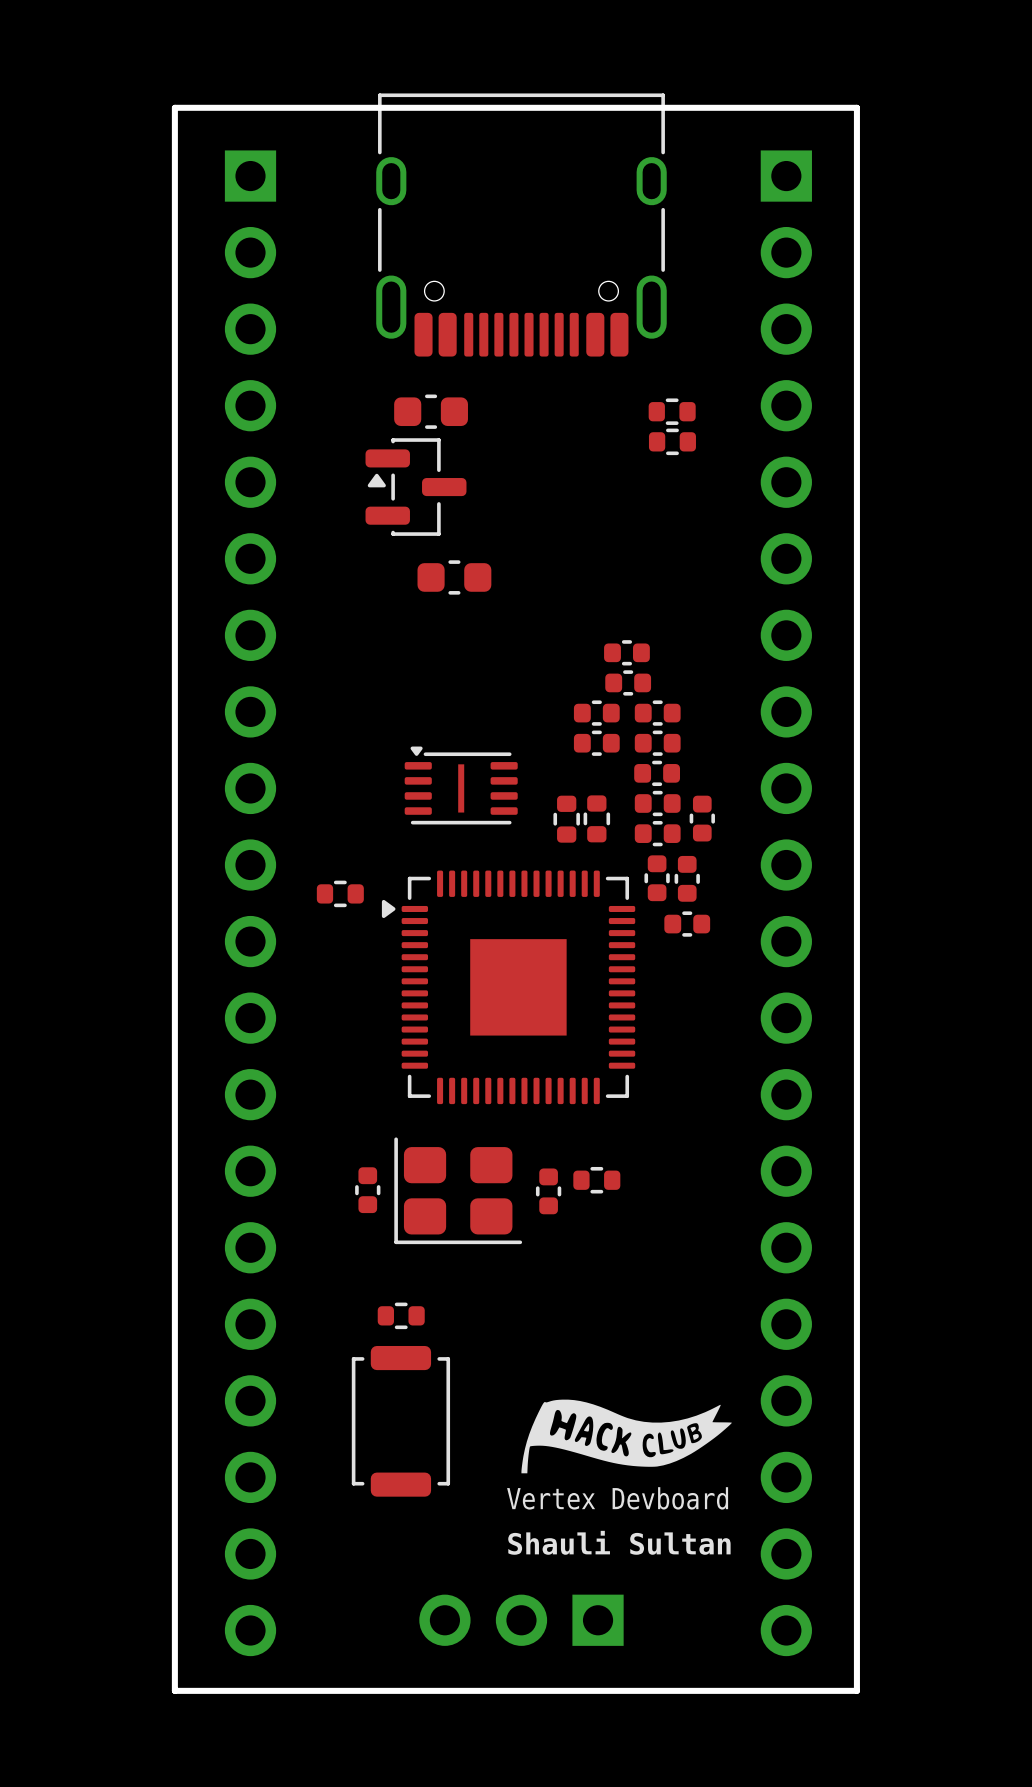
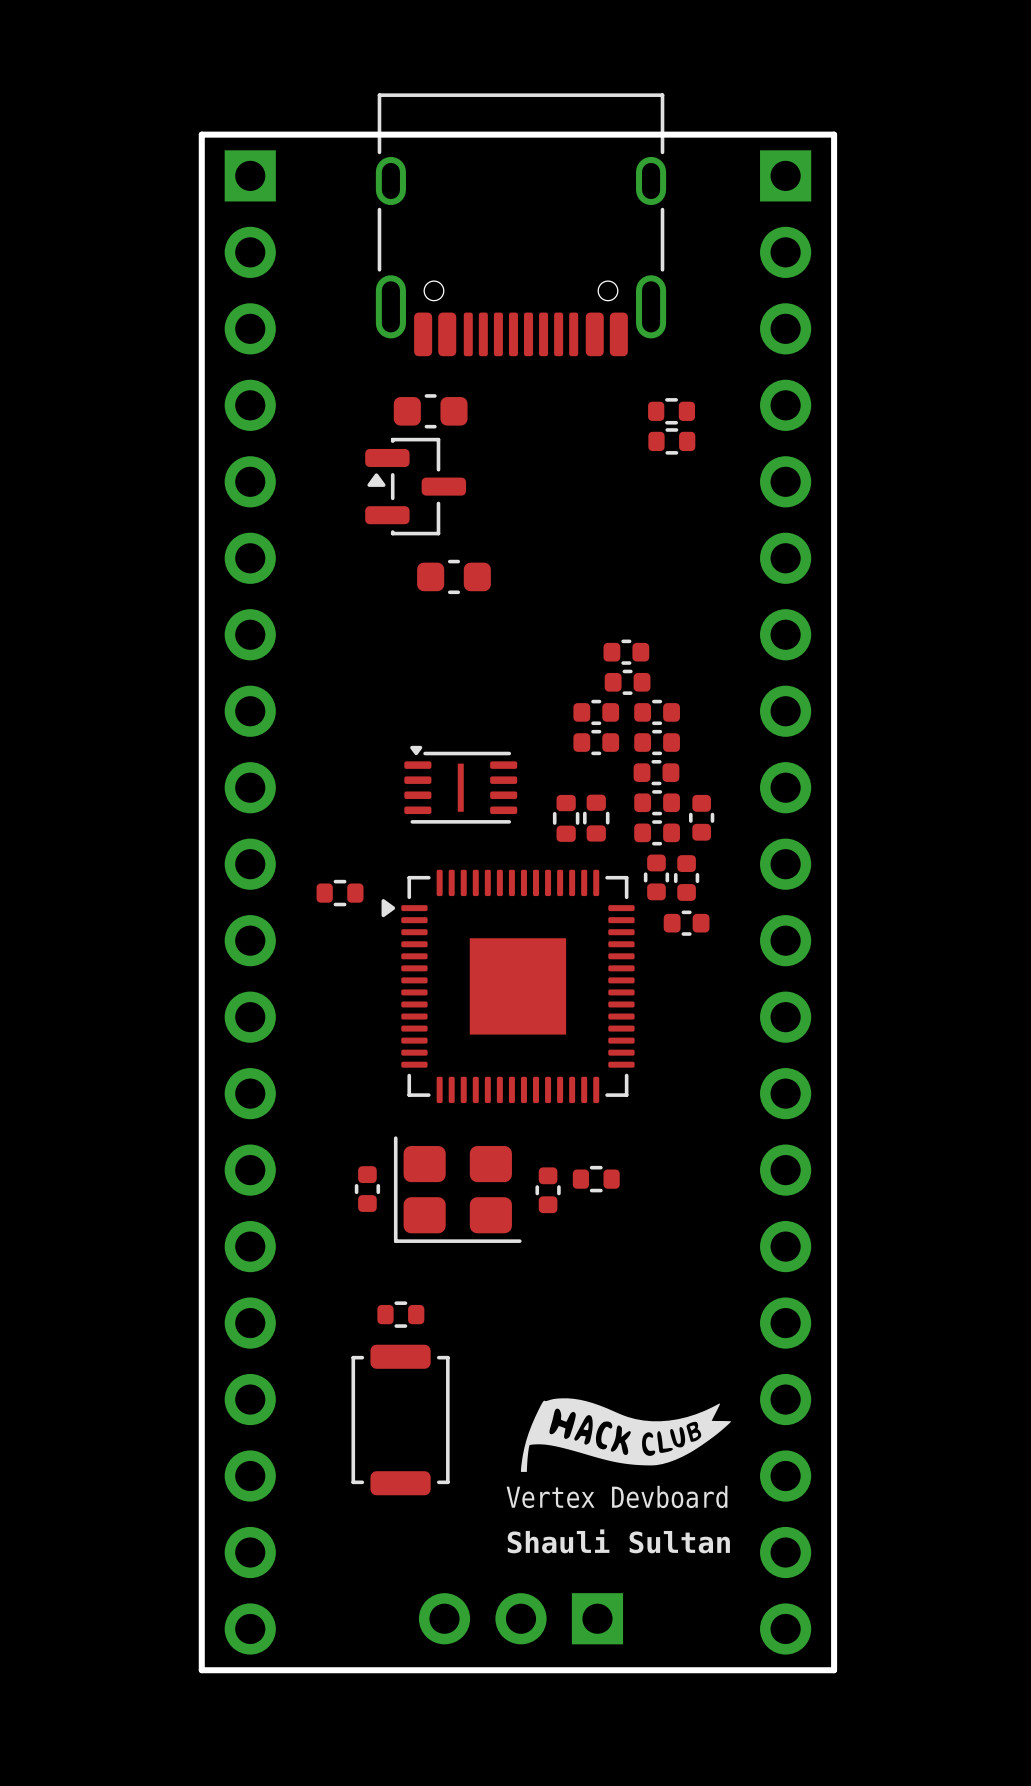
board edge: (174, 107) (856, 107) (856, 1690) (174, 1690) (174, 107) -> (201, 134) (201, 1670) (834, 1670) (834, 134) (201, 134)

